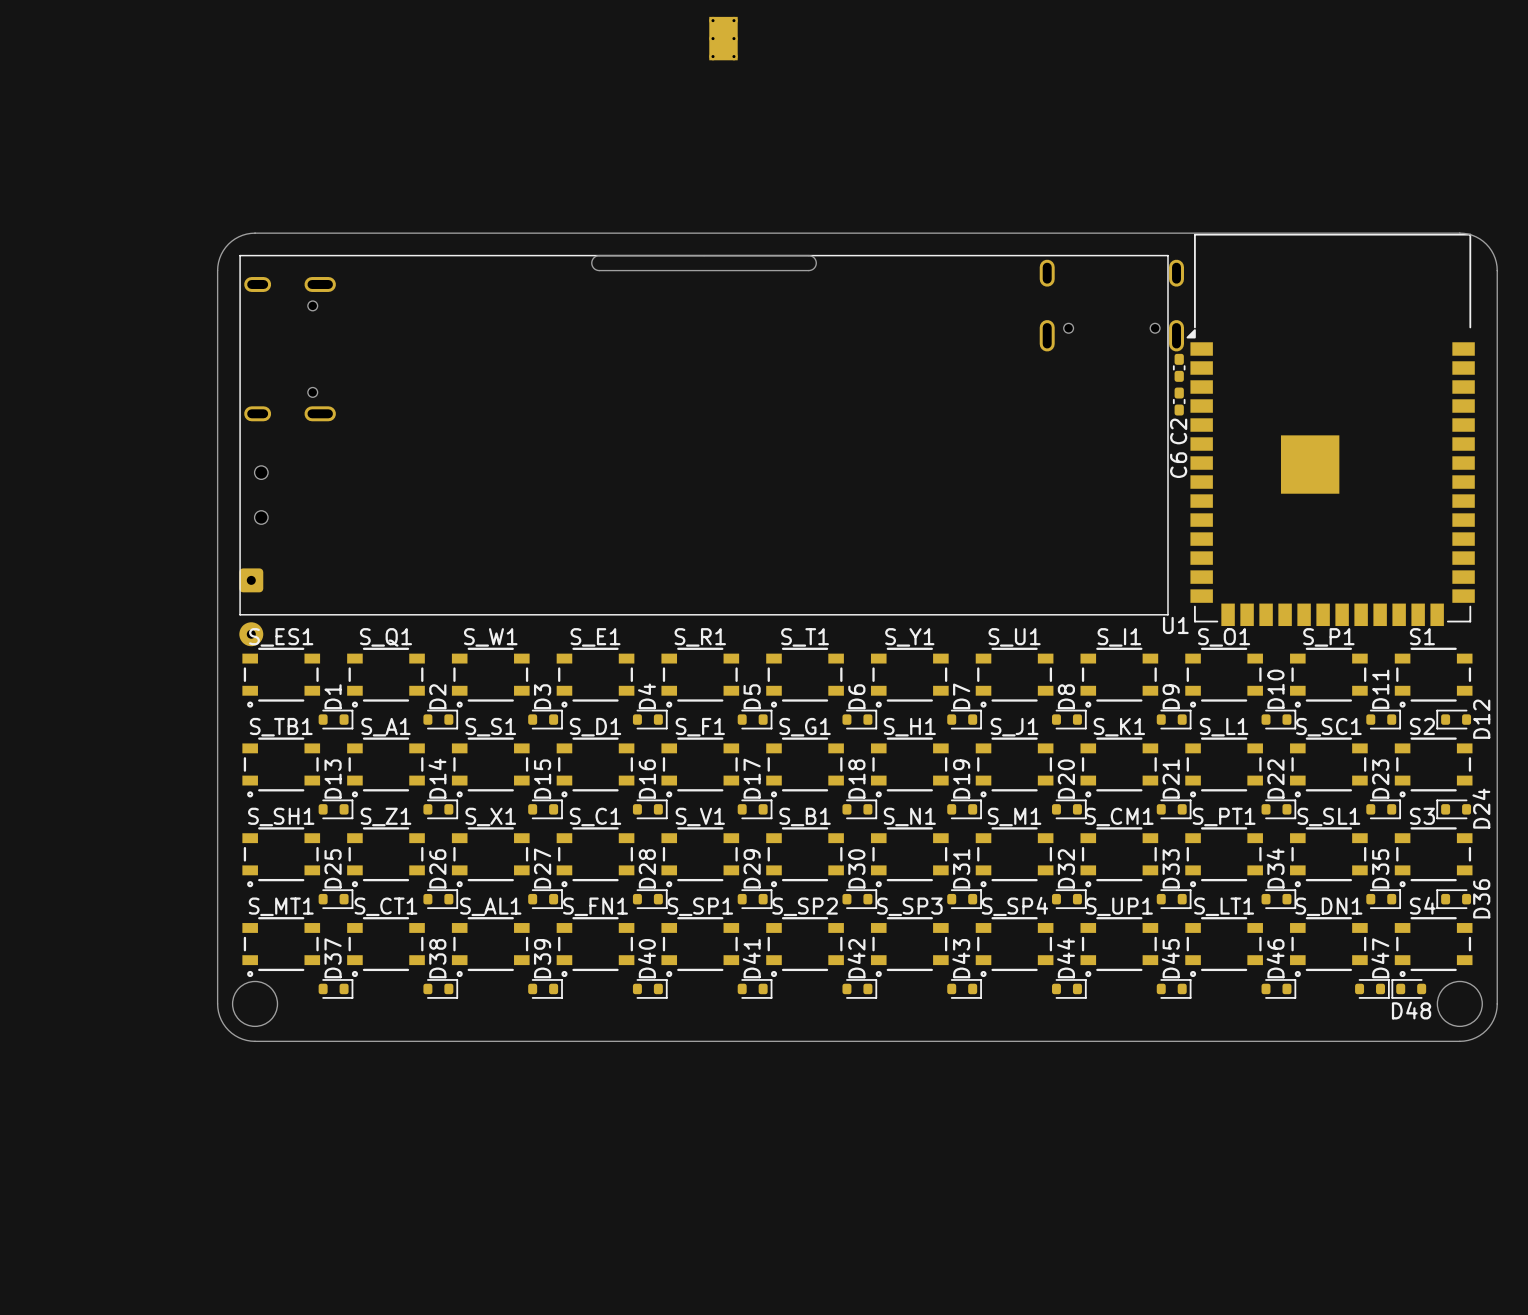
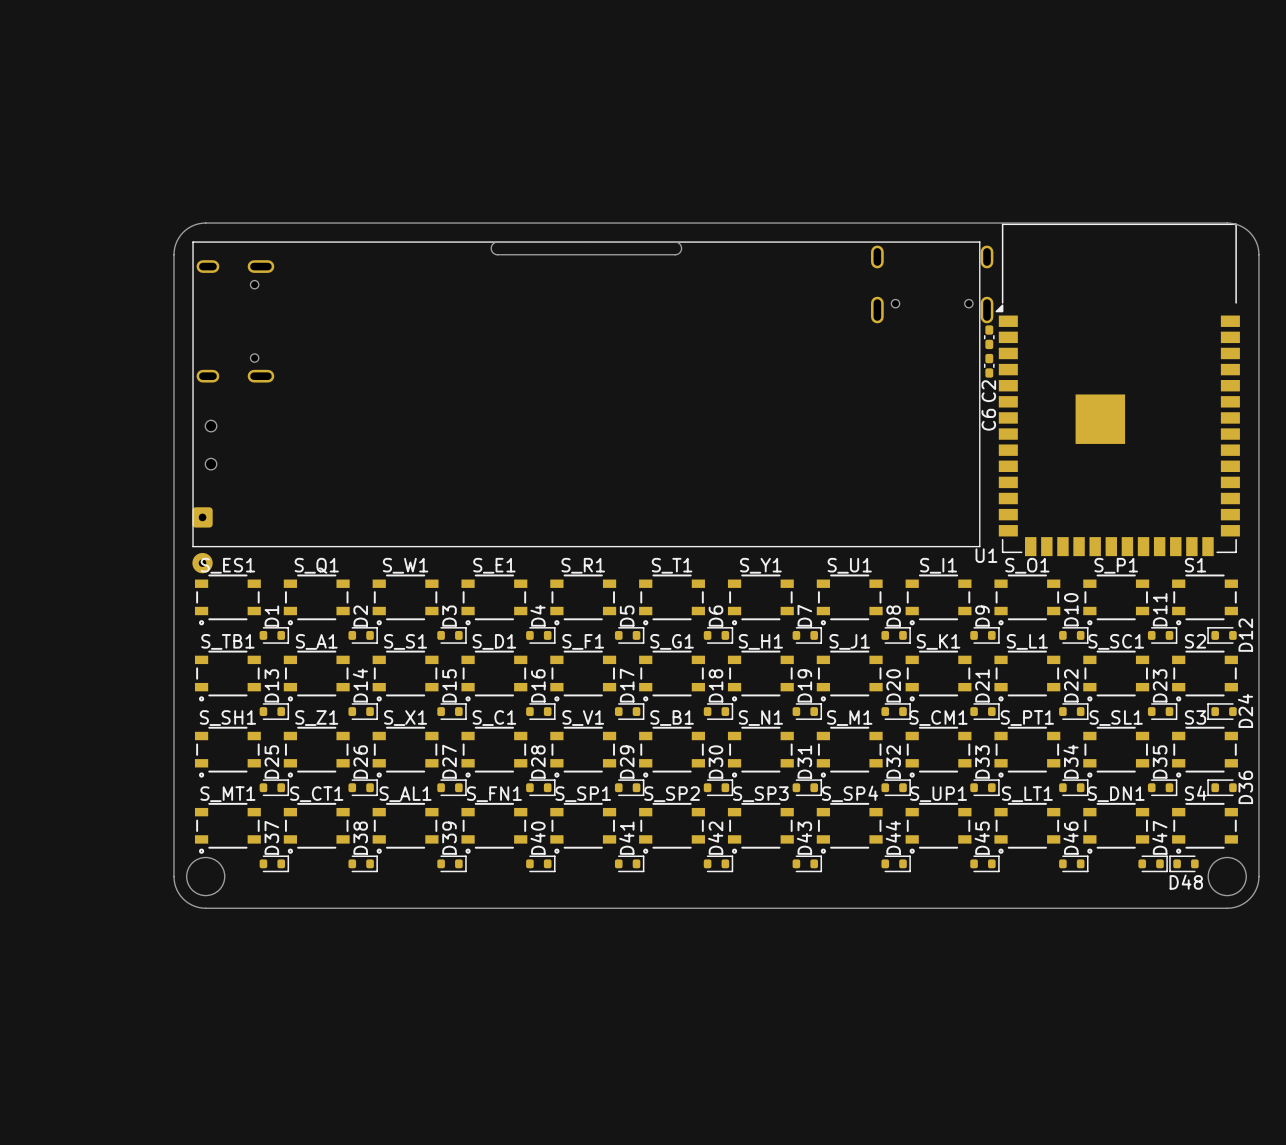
part: (723, 38) -> none

